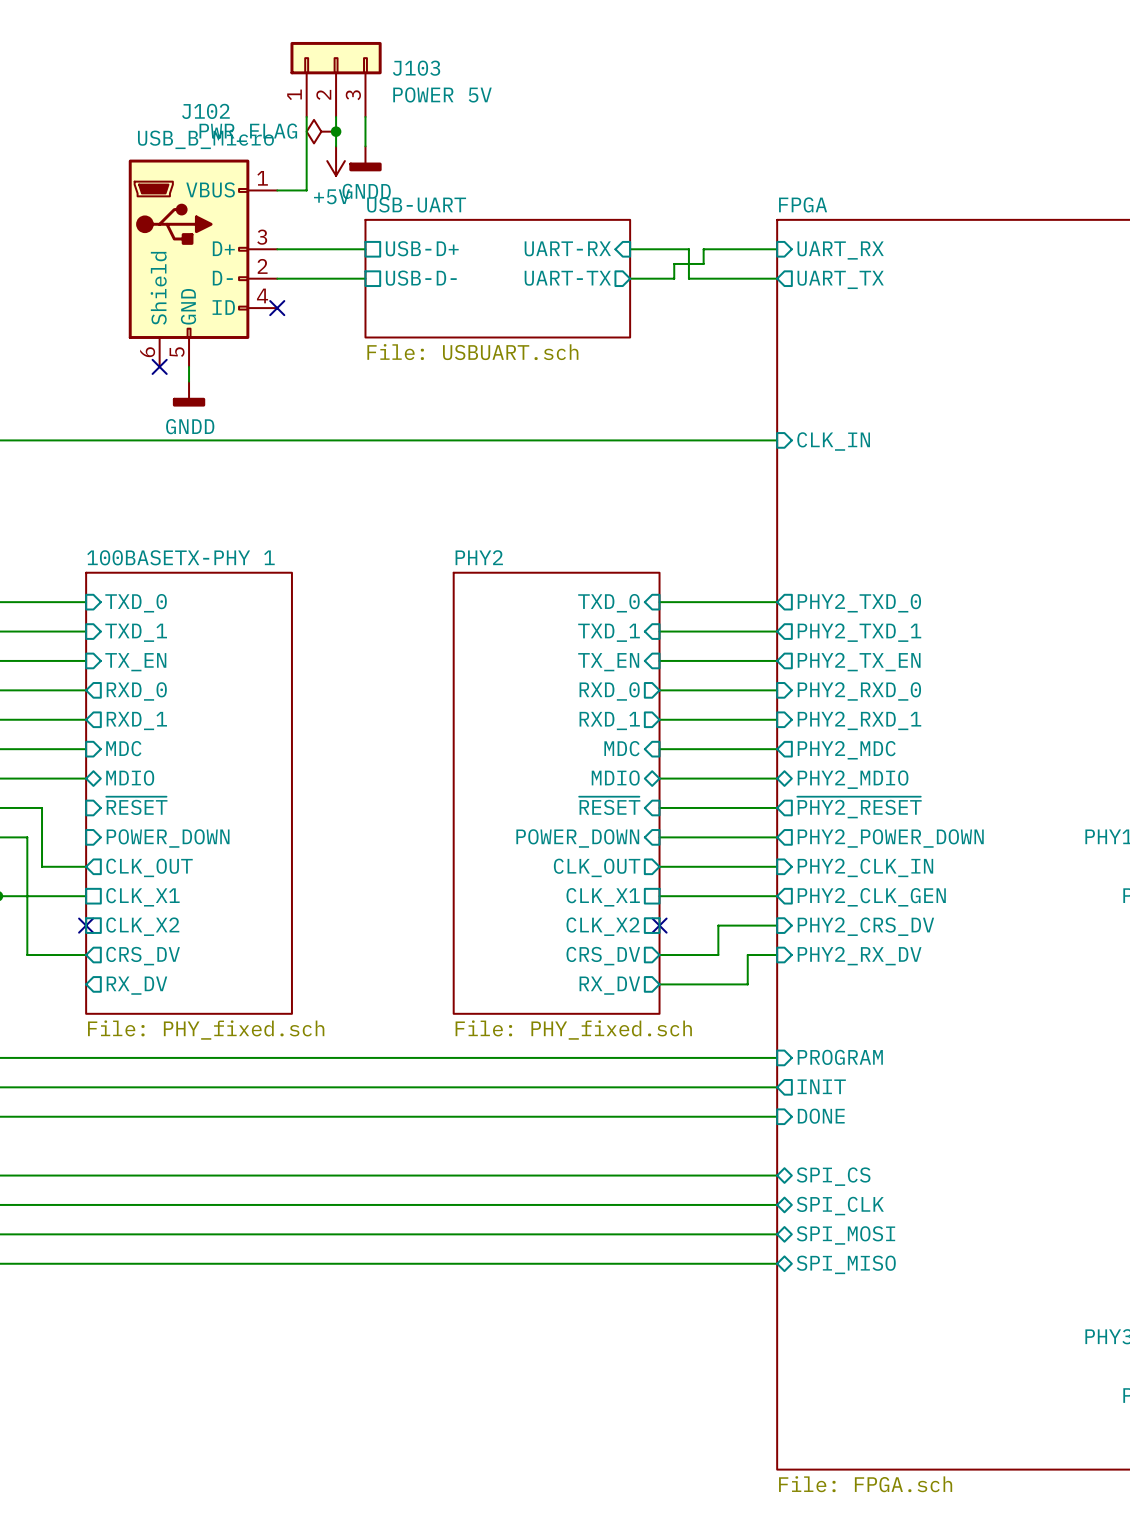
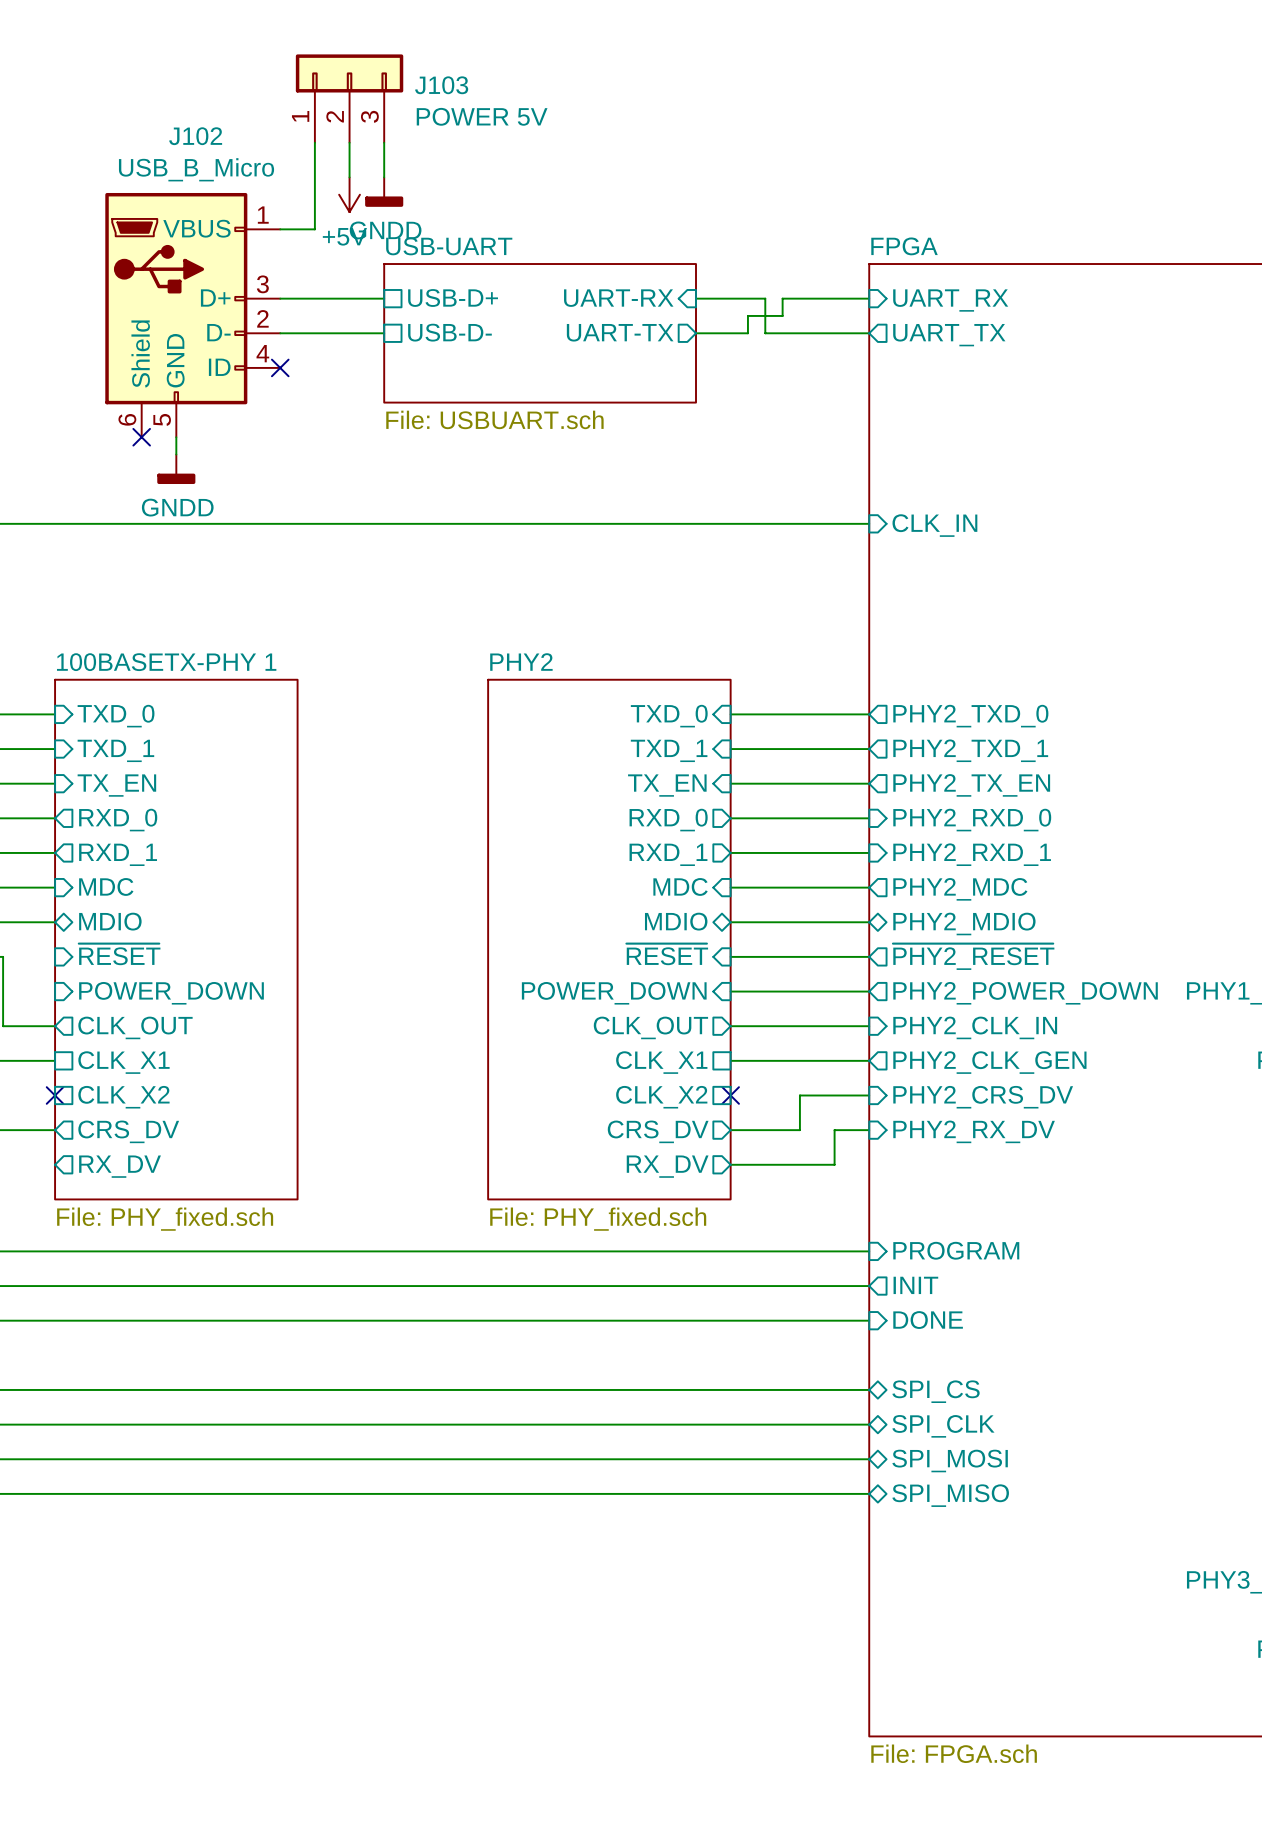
power symbol: PWR_FLAG (321, 131) -> none
junction: (336, 131) -> none

